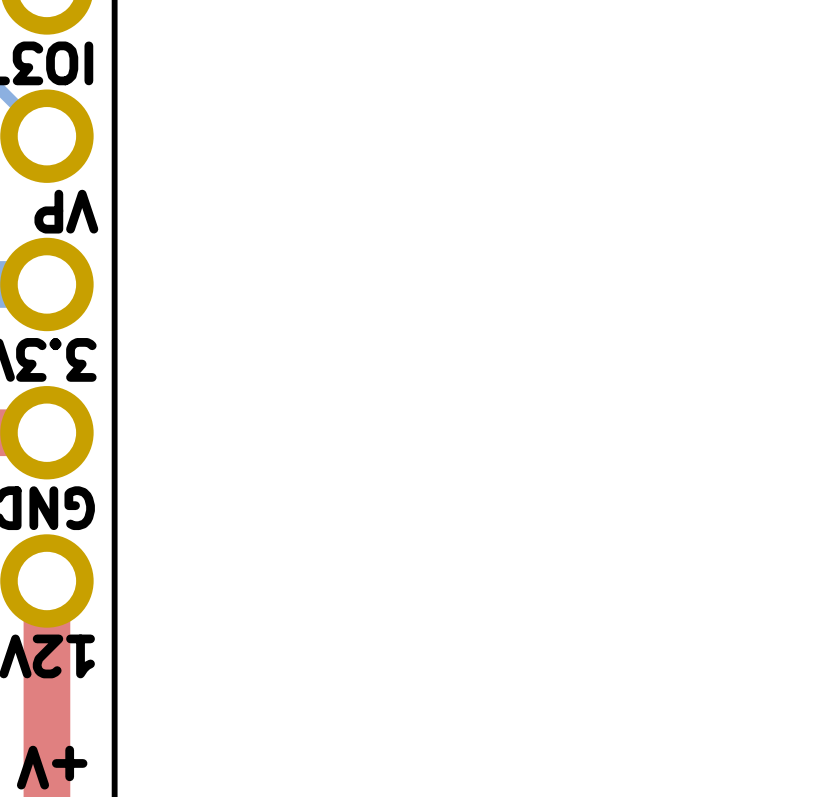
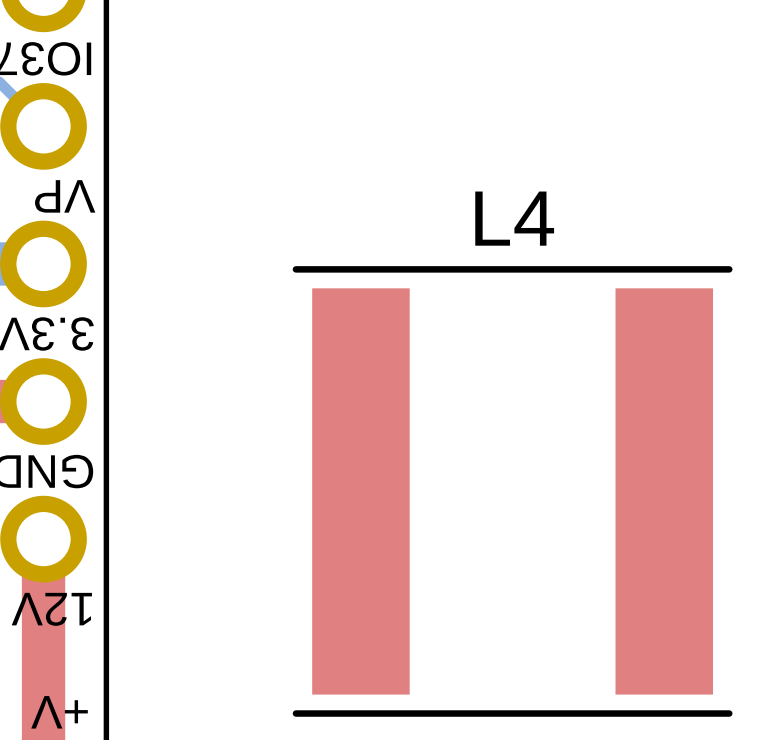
L4: none -> (512, 491)

